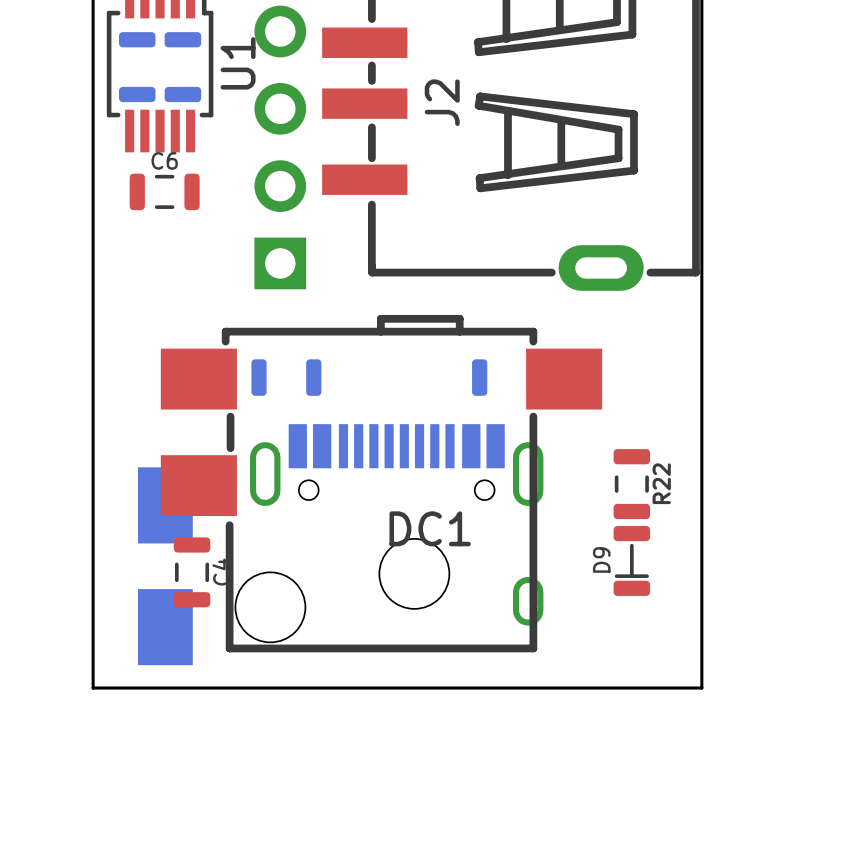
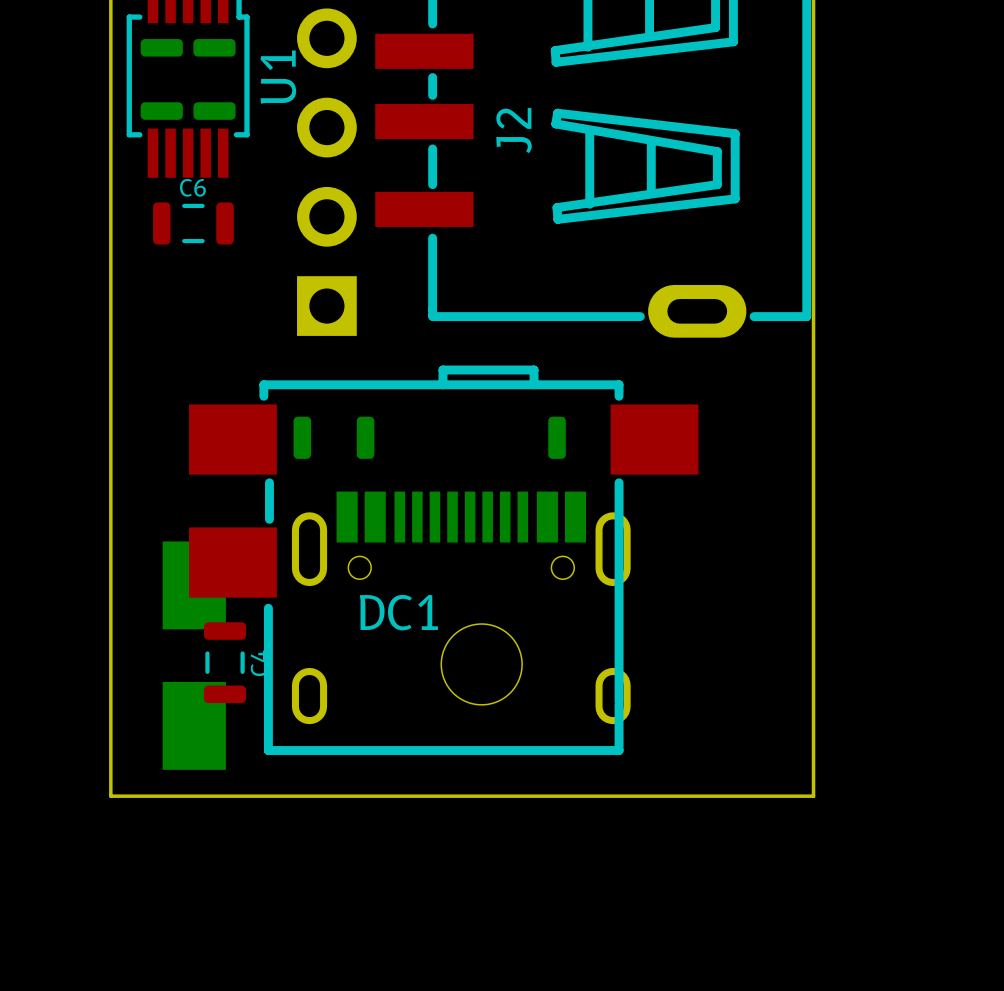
DC1 footprint: [160, 314, 603, 653] -> [189, 365, 699, 755]
R22: (631, 484) -> none
DC1 name position: DC1 (430, 528) -> DC1 (398, 612)
D9: (631, 560) -> none

